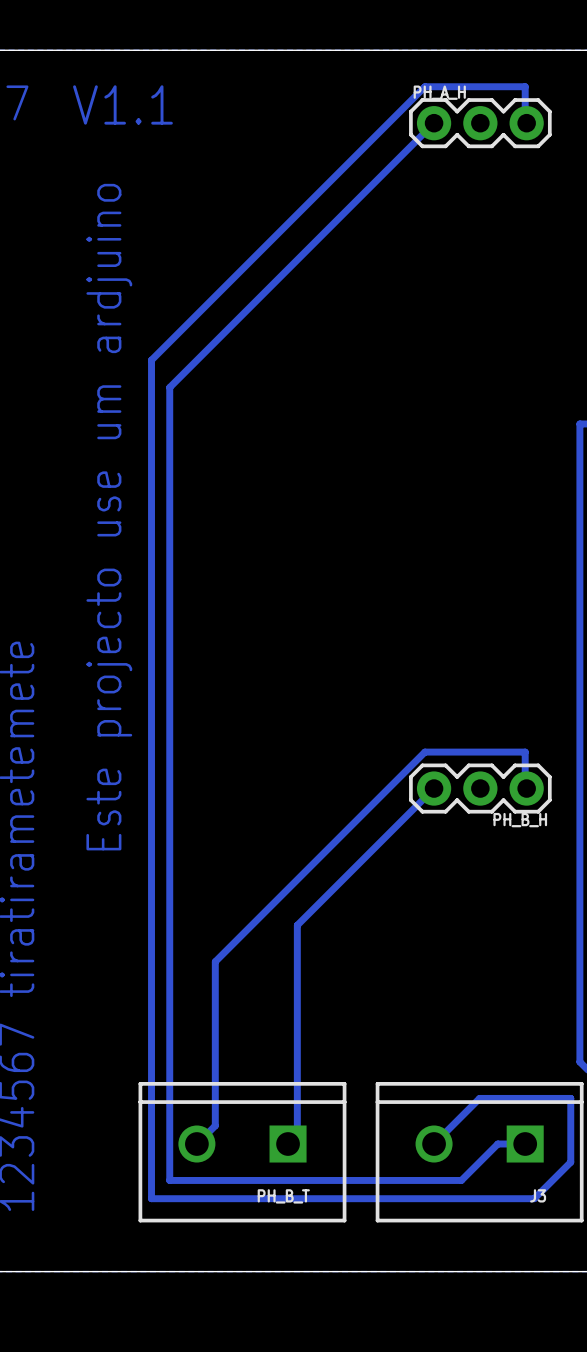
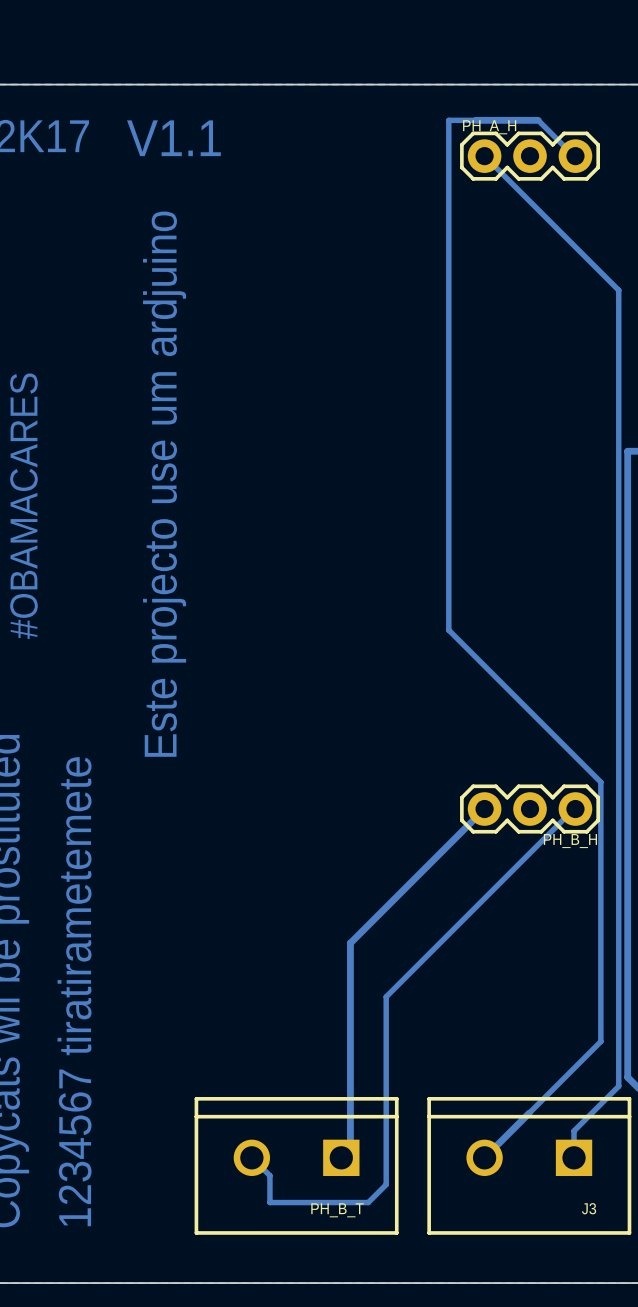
track: (424, 86) (151, 360) (151, 1198) (534, 1198) (570, 1162) (570, 1098) (479, 1098) -> (475, 120) (448, 120) (448, 630) (600, 782) (600, 1041) (529, 1113)
track: (488, 86) (525, 86) (525, 123) -> (538, 120) (574, 156)
track: (434, 123) (169, 387) (169, 1180) (461, 1180) (497, 1144) (525, 1144) -> (484, 156) (618, 290) (618, 1086) (574, 1131) (574, 1157)
track: (525, 788) (525, 752) (424, 752) (215, 961) (215, 1125) (197, 1144) -> (574, 809) (386, 996) (386, 1184) (368, 1202) (269, 1202) (269, 1175) (252, 1157)

